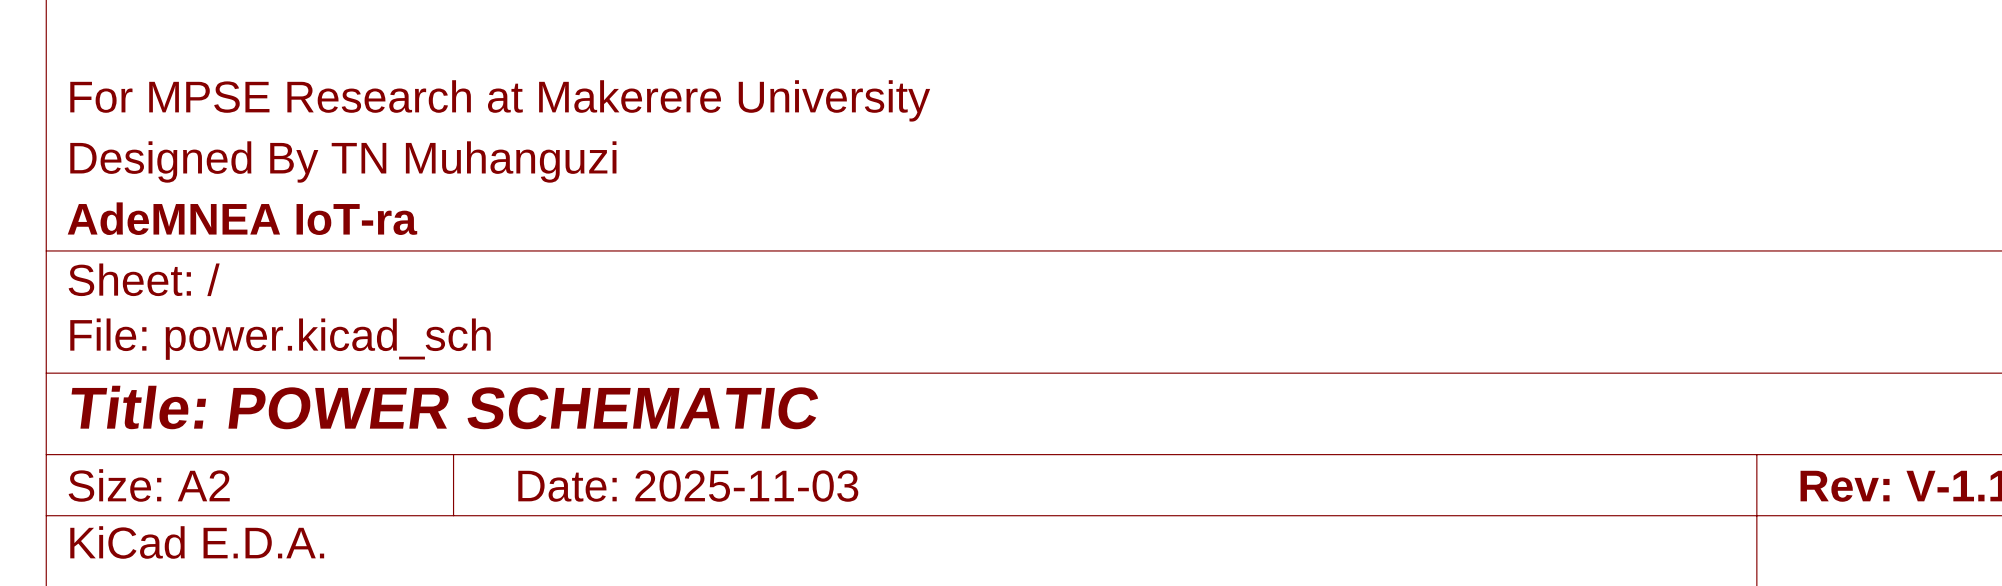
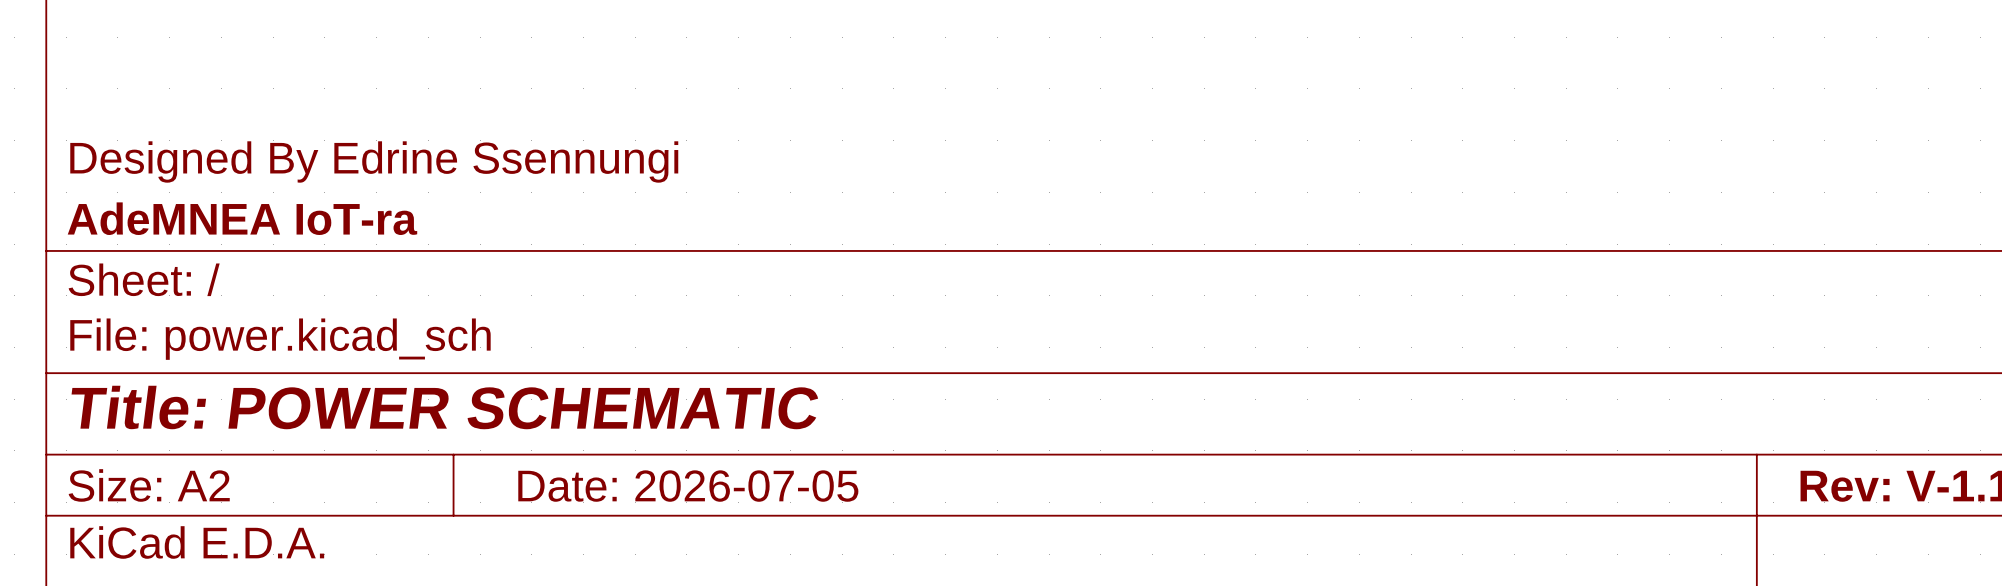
title block: For MPSE Research at Makerere University (500, 100) -> none
title block: Designed By TN Muhanguzi (343, 161) -> Designed By Edrine Ssennungi (374, 161)
title block: Date: 2025-11-03 (688, 486) -> Date: 2026-07-05 (688, 486)

